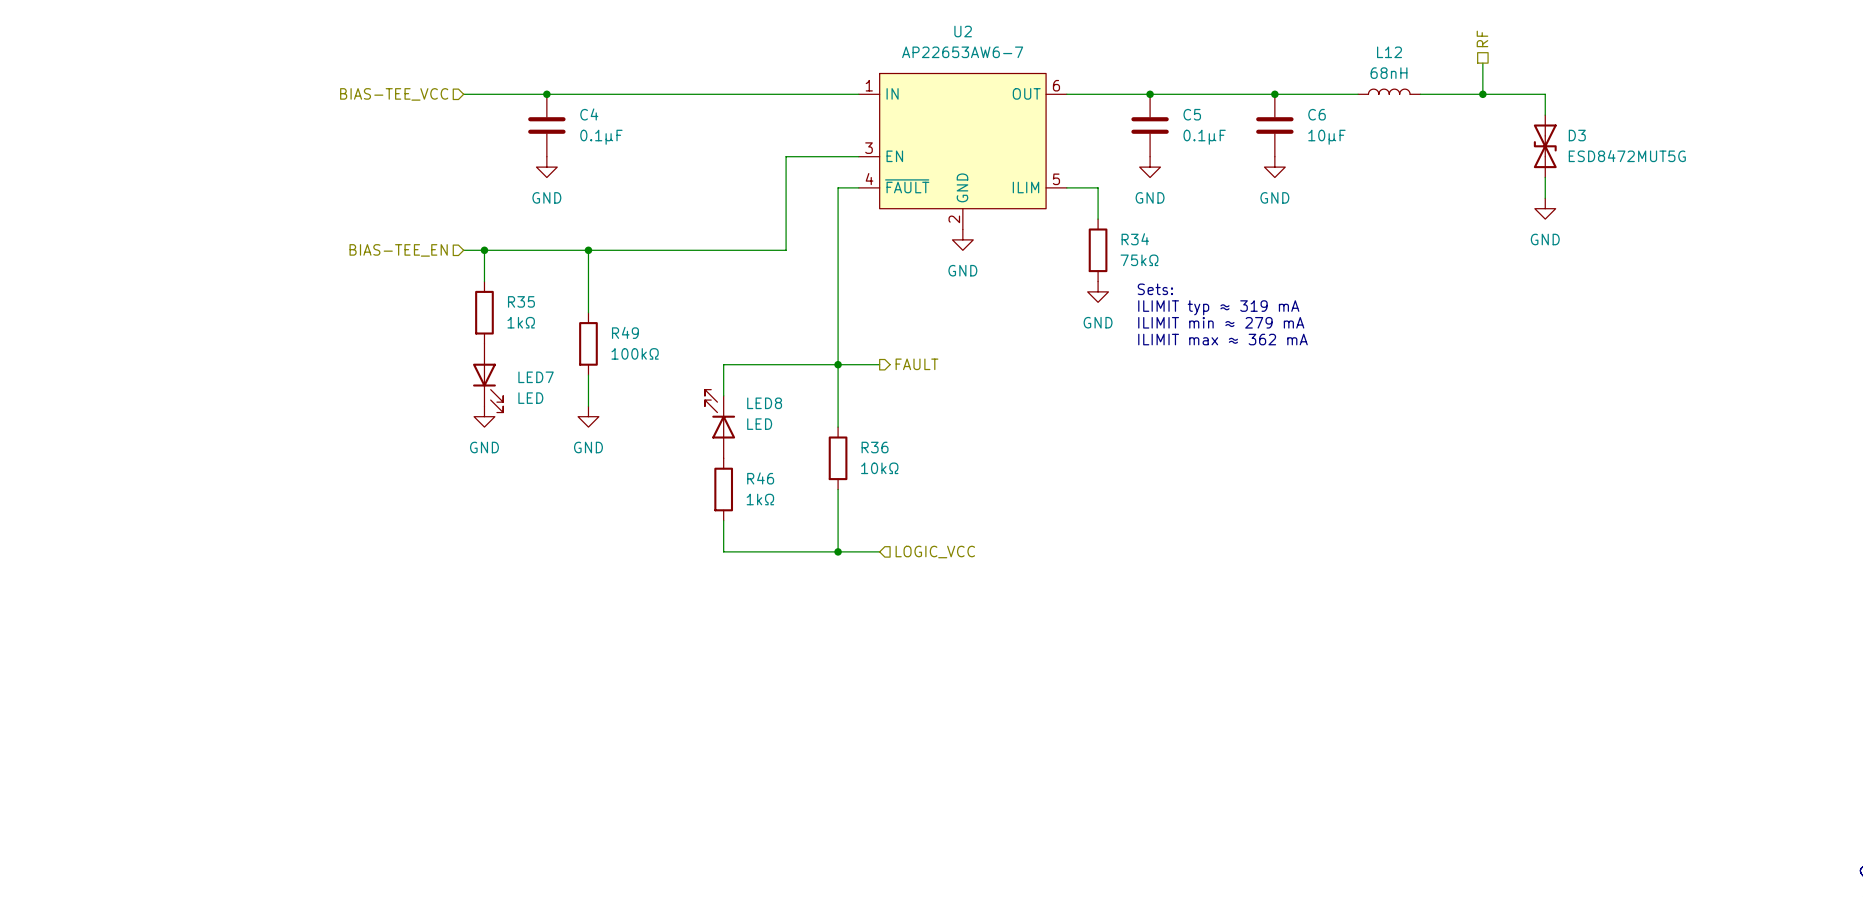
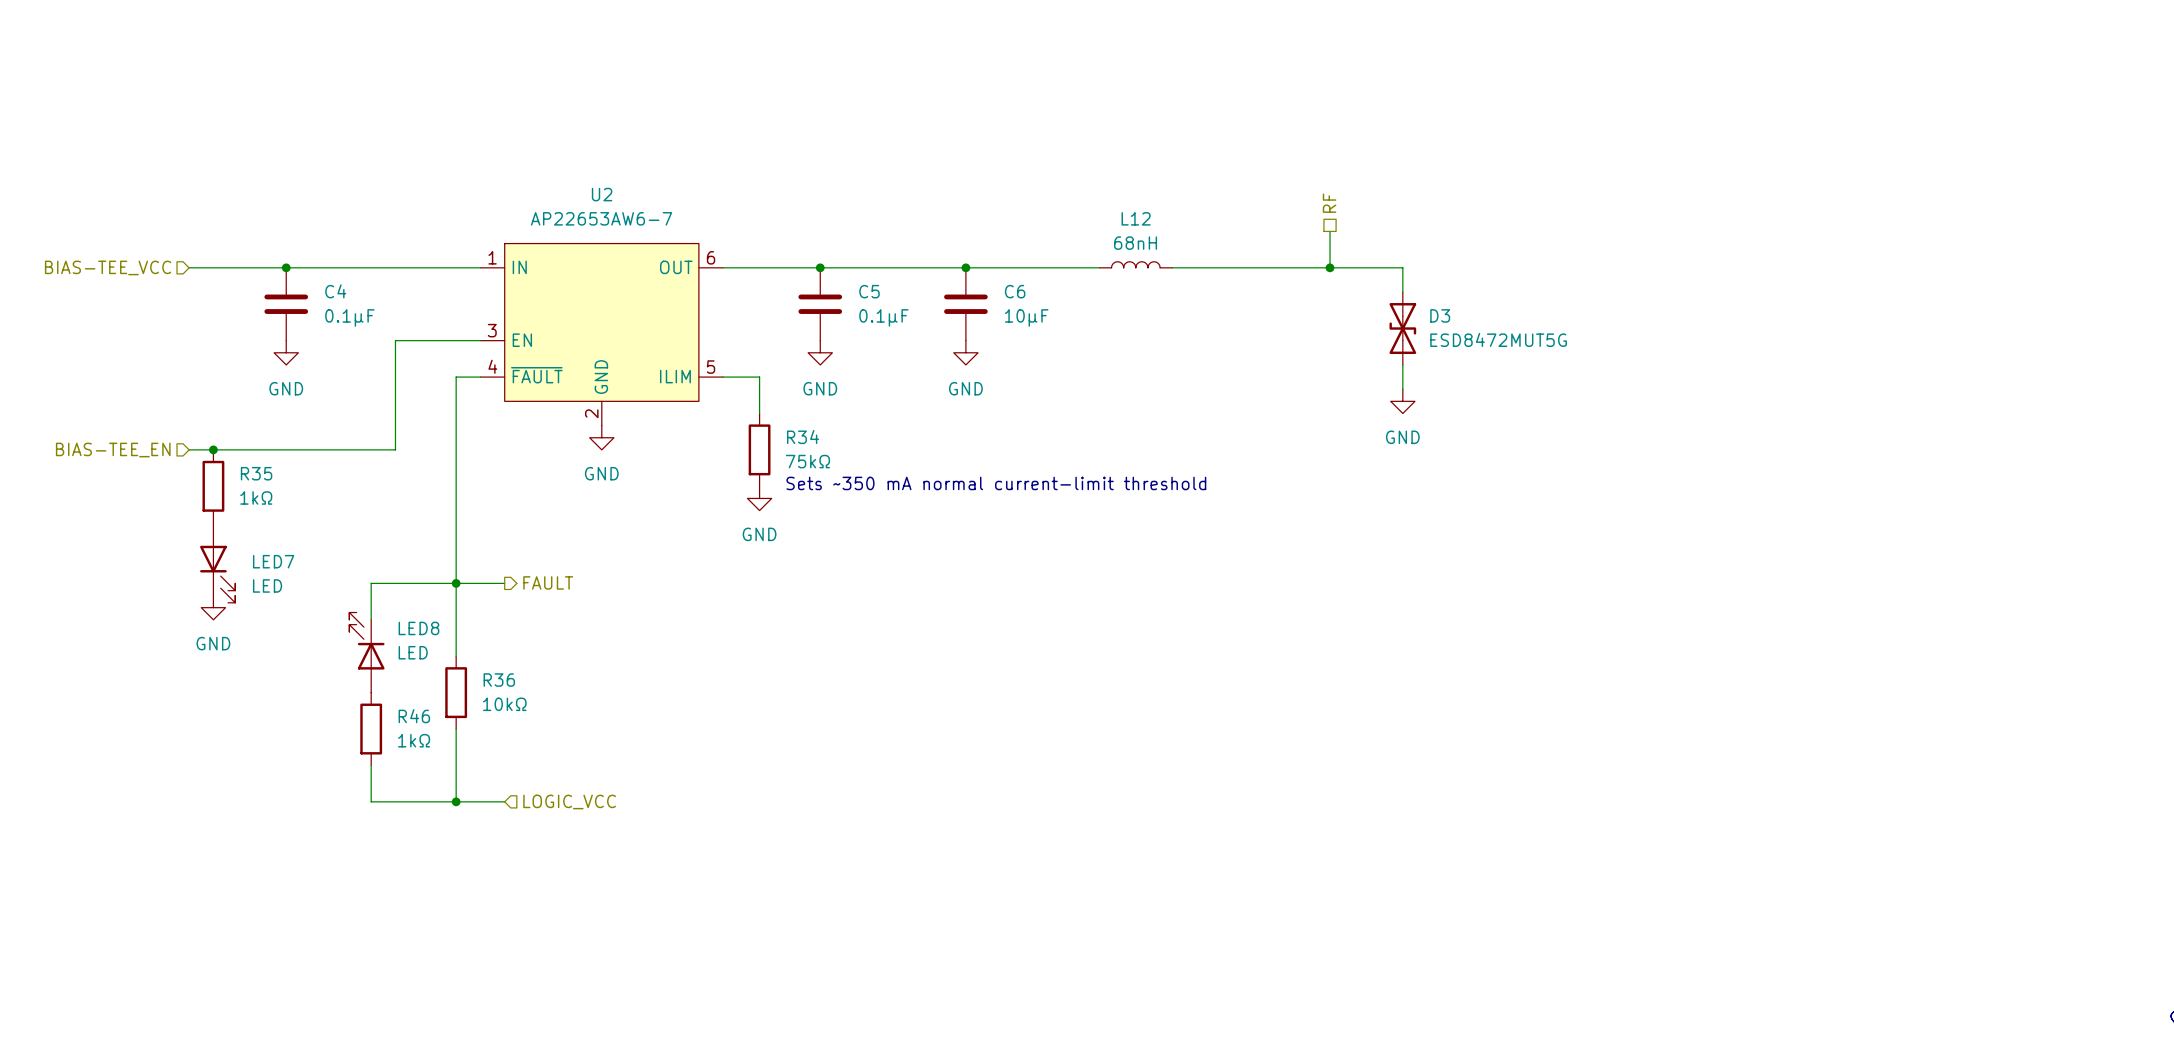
hierarchical label: RF (1482, 38) -> none
wire: (1482, 63) (1482, 94) -> none
L12 position: (1389, 91) -> (1135, 264)
hierarchical label: BIAS-TEE_VCC (394, 94) -> none
wire: (463, 94) (858, 94) -> none
junction: (546, 94) -> none
wire: (1066, 94) (1358, 94) -> none
junction: (1150, 94) -> none
junction: (1274, 94) -> none
wire: (1420, 94) (1545, 94) (1545, 115) -> none
junction: (1482, 94) -> none
C4 position: (546, 125) -> (286, 304)
C5 position: (1150, 125) -> (820, 304)
C6 position: (1274, 125) -> (965, 304)
D3 position: (1545, 146) -> (1402, 328)
U2 position: (962, 151) -> (601, 334)
wire: (858, 156) (786, 156) (786, 250) (463, 250) -> none
power symbol: GND (546, 167) -> none
power symbol: GND (1150, 167) -> none
power symbol: GND (1274, 167) -> none
hierarchical label: none -> RF (1329, 203)
wire: (1545, 177) (1545, 198) -> none
wire: (858, 187) (838, 187) (838, 427) -> none
wire: (1066, 187) (1098, 187) (1098, 219) -> none
wire: none -> (1330, 231) (1330, 267)
power symbol: GND (1545, 208) -> none
hierarchical label: none -> BIAS-TEE_VCC (108, 267)
wire: none -> (189, 267) (480, 267)
junction: none -> (286, 267)
wire: none -> (723, 267) (1099, 267)
junction: none -> (820, 267)
junction: none -> (965, 267)
wire: none -> (1172, 267) (1402, 267) (1402, 292)
junction: none -> (1330, 267)
power symbol: GND (962, 239) -> none
hierarchical label: BIAS-TEE_EN (398, 250) -> none
junction: (484, 250) -> none
junction: (588, 250) -> none
R34 position: (1098, 250) -> (759, 449)
text: Sets: (1155, 289) -> none
wire: none -> (480, 340) (395, 340) (395, 449) (189, 449)
power symbol: GND (1098, 291) -> none
power symbol: none -> GND (286, 352)
power symbol: none -> GND (820, 352)
power symbol: none -> GND (965, 352)
text: ILIMIT typ ≈ 319 mA (1218, 307) -> none
R35 position: (484, 312) -> (213, 486)
wire: none -> (1402, 364) (1402, 389)
text: ILIMIT min ≈ 279 mA (1221, 322) -> none
wire: none -> (480, 377) (456, 377) (456, 656)
wire: none -> (723, 377) (759, 377) (759, 413)
text: ILIMIT max ≈ 362 mA (1222, 339) -> none
R49: 100kΩ (588, 343) -> none
power symbol: none -> GND (1402, 401)
junction: (838, 364) -> none
wire: (879, 364) (723, 364) (723, 395) -> none
hierarchical label: FAULT (916, 364) -> none
power symbol: none -> GND (601, 437)
wire: (588, 375) (588, 406) -> none
LED7 position: (488, 378) -> (217, 562)
hierarchical label: none -> BIAS-TEE_EN (113, 450)
junction: none -> (213, 449)
text: none -> Sets ~350 mA normal current-limit threshold (996, 483)
power symbol: GND (484, 416) -> none
power symbol: GND (588, 416) -> none
LED8 position: (720, 423) -> (366, 652)
power symbol: none -> GND (759, 498)
R36 position: (838, 458) -> (456, 692)
R46 position: (723, 489) -> (371, 729)
wire: (838, 489) (838, 551) -> none
junction: none -> (456, 583)
wire: none -> (504, 583) (371, 583) (371, 619)
hierarchical label: none -> FAULT (548, 582)
power symbol: none -> GND (213, 607)
wire: (723, 520) (723, 551) (879, 551) -> none
junction: (838, 551) -> none
hierarchical label: LOGIC_VCC (935, 552) -> none
wire: none -> (456, 729) (456, 801)
wire: none -> (371, 765) (371, 801) (504, 801)
junction: none -> (456, 801)
hierarchical label: none -> LOGIC_VCC (569, 801)

